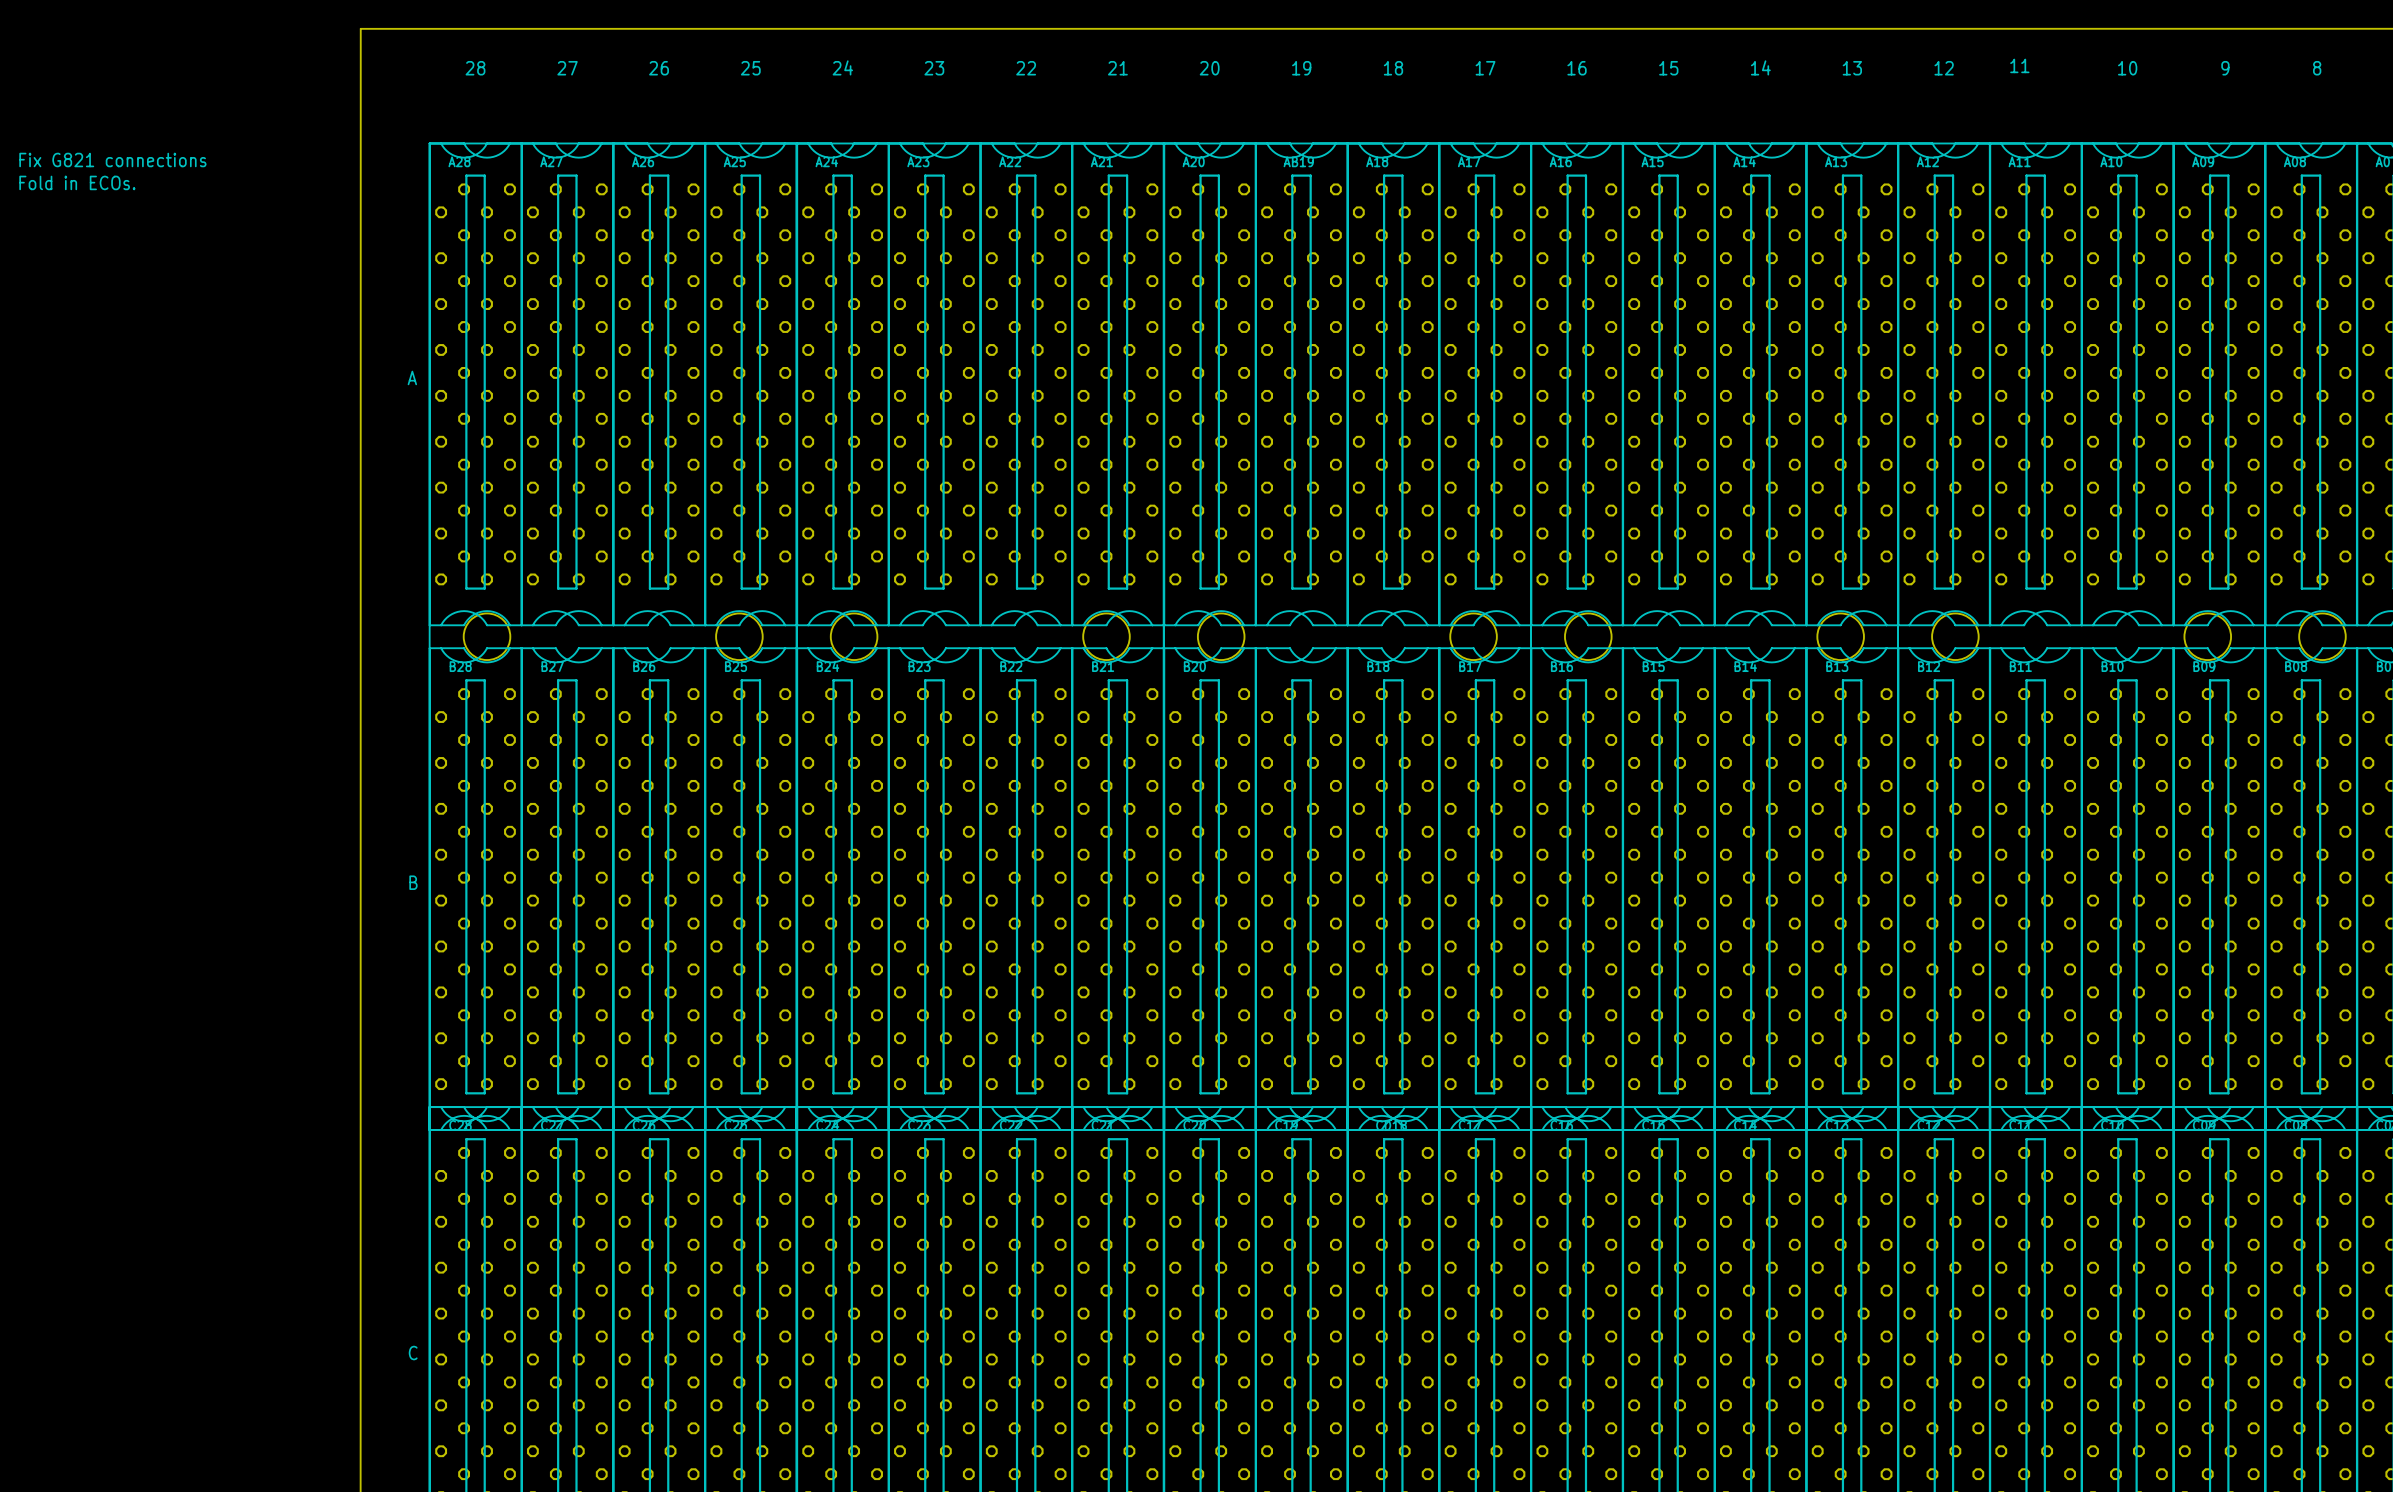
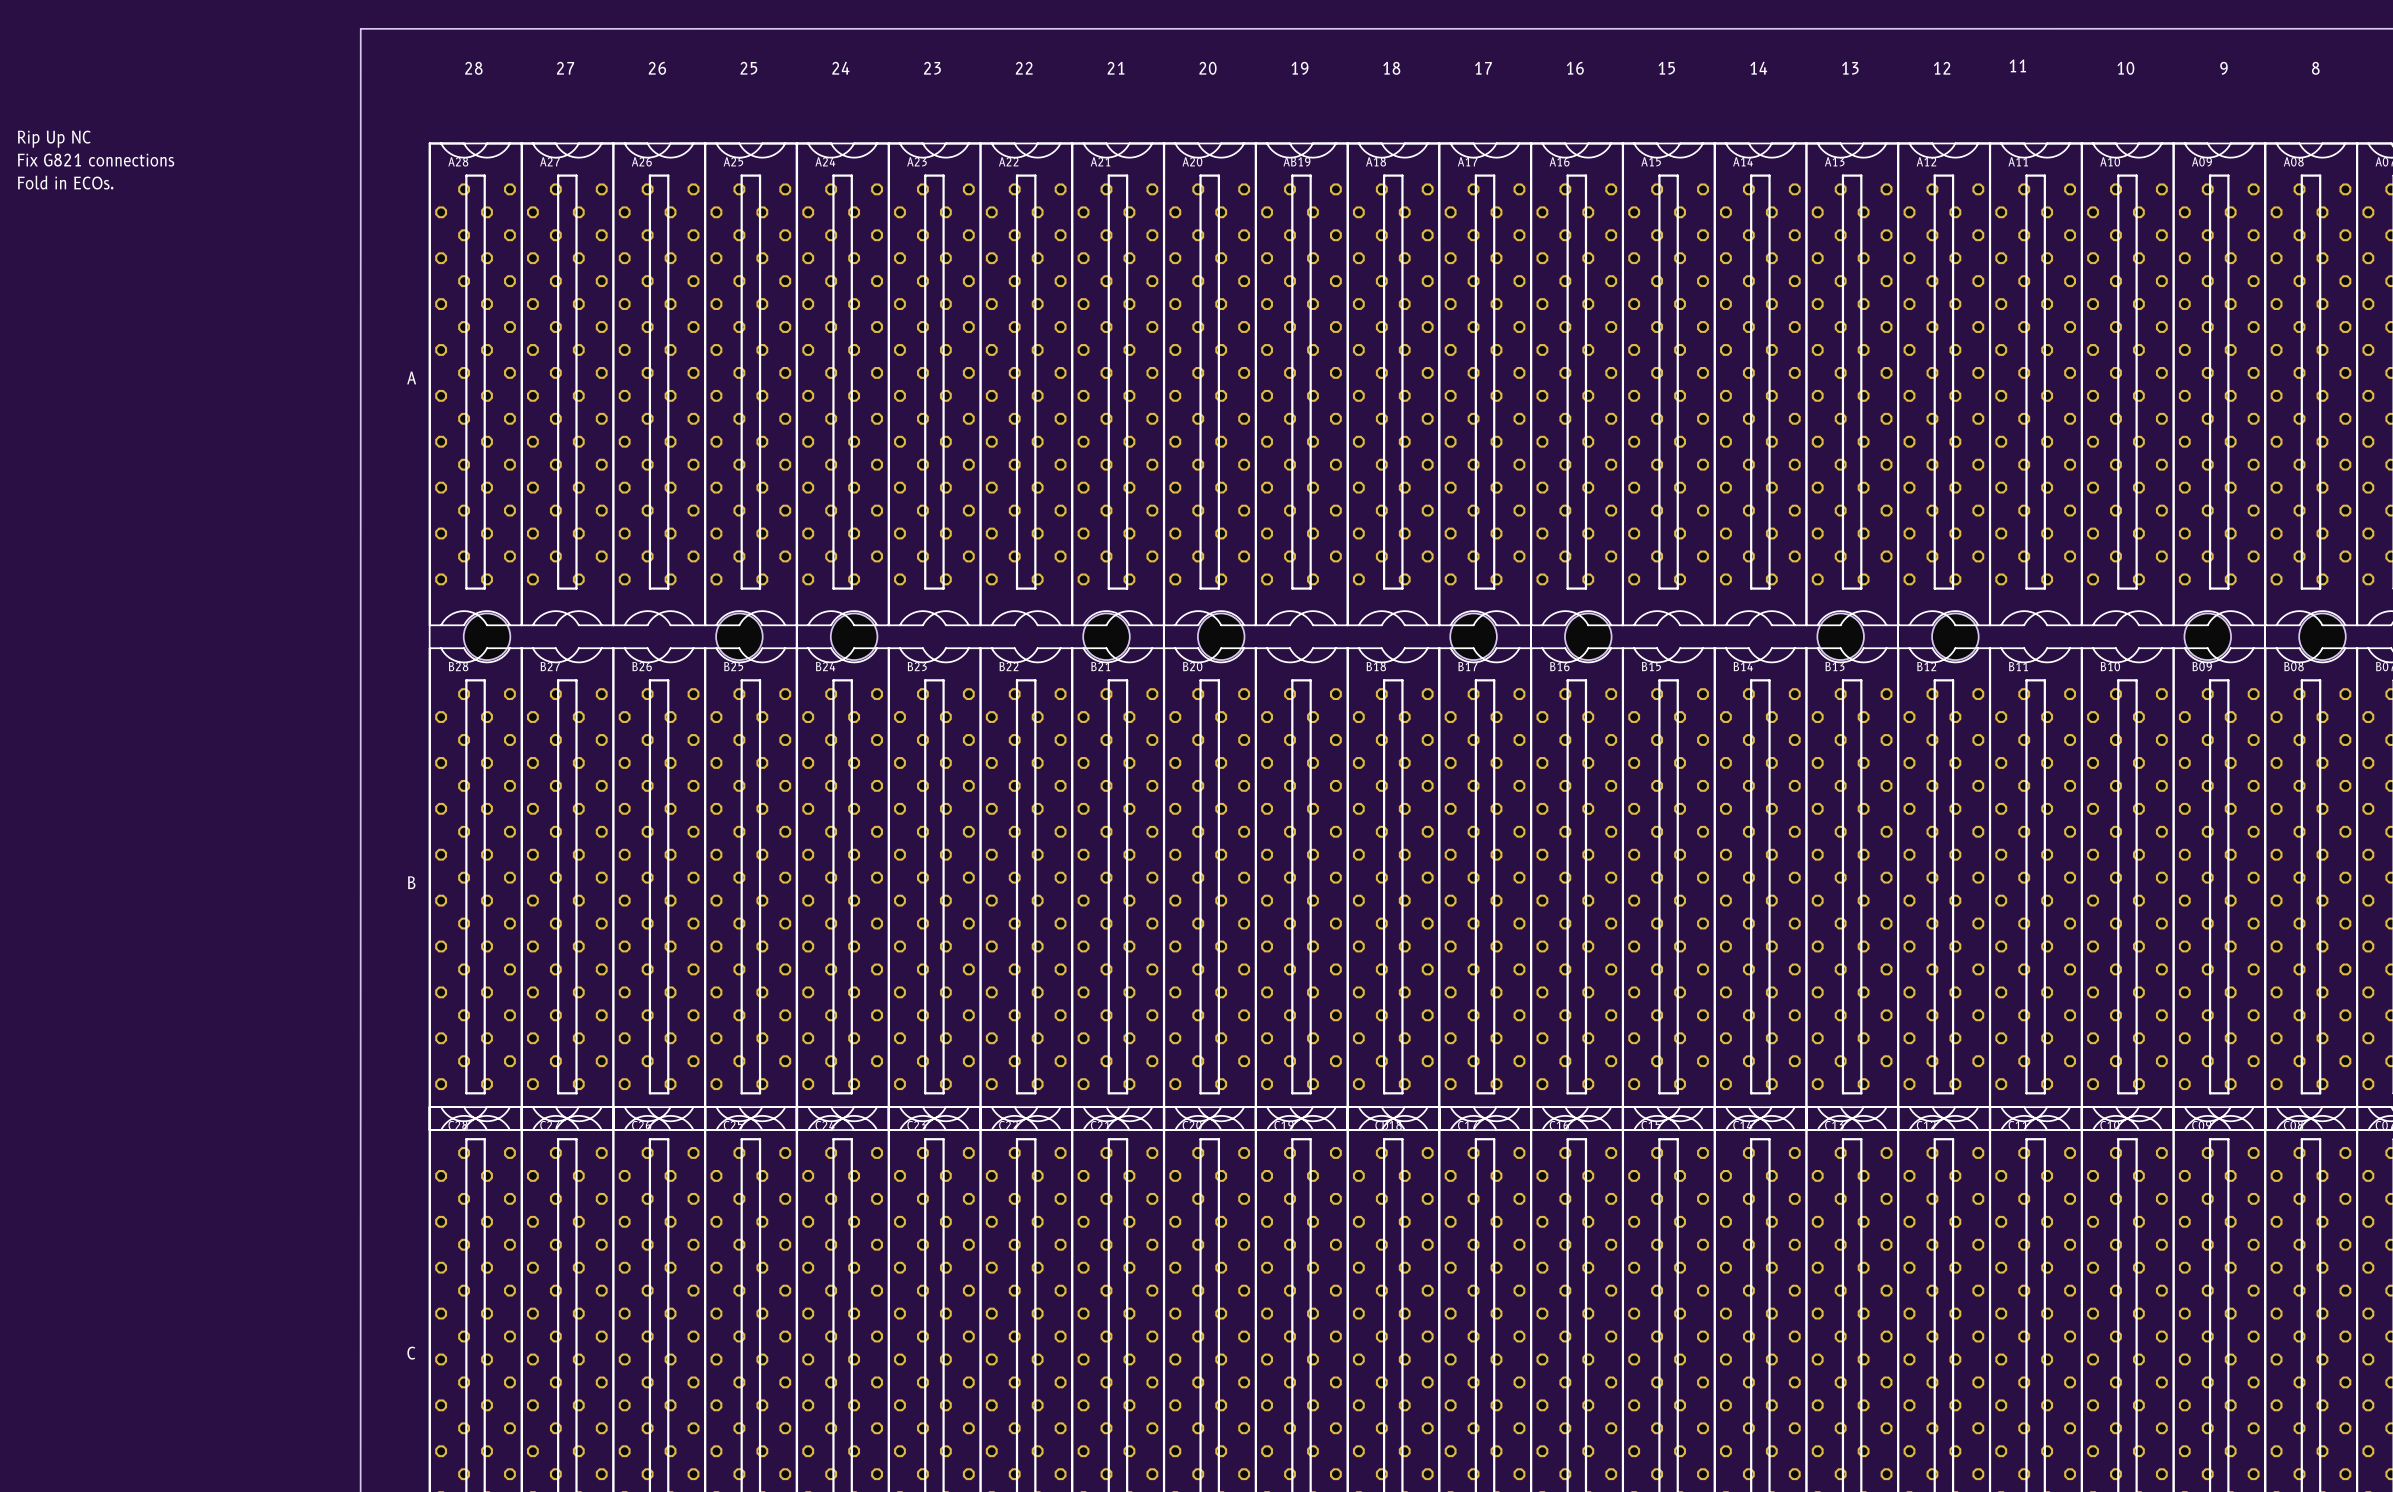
text: none -> Rip Up NC (54, 139)

